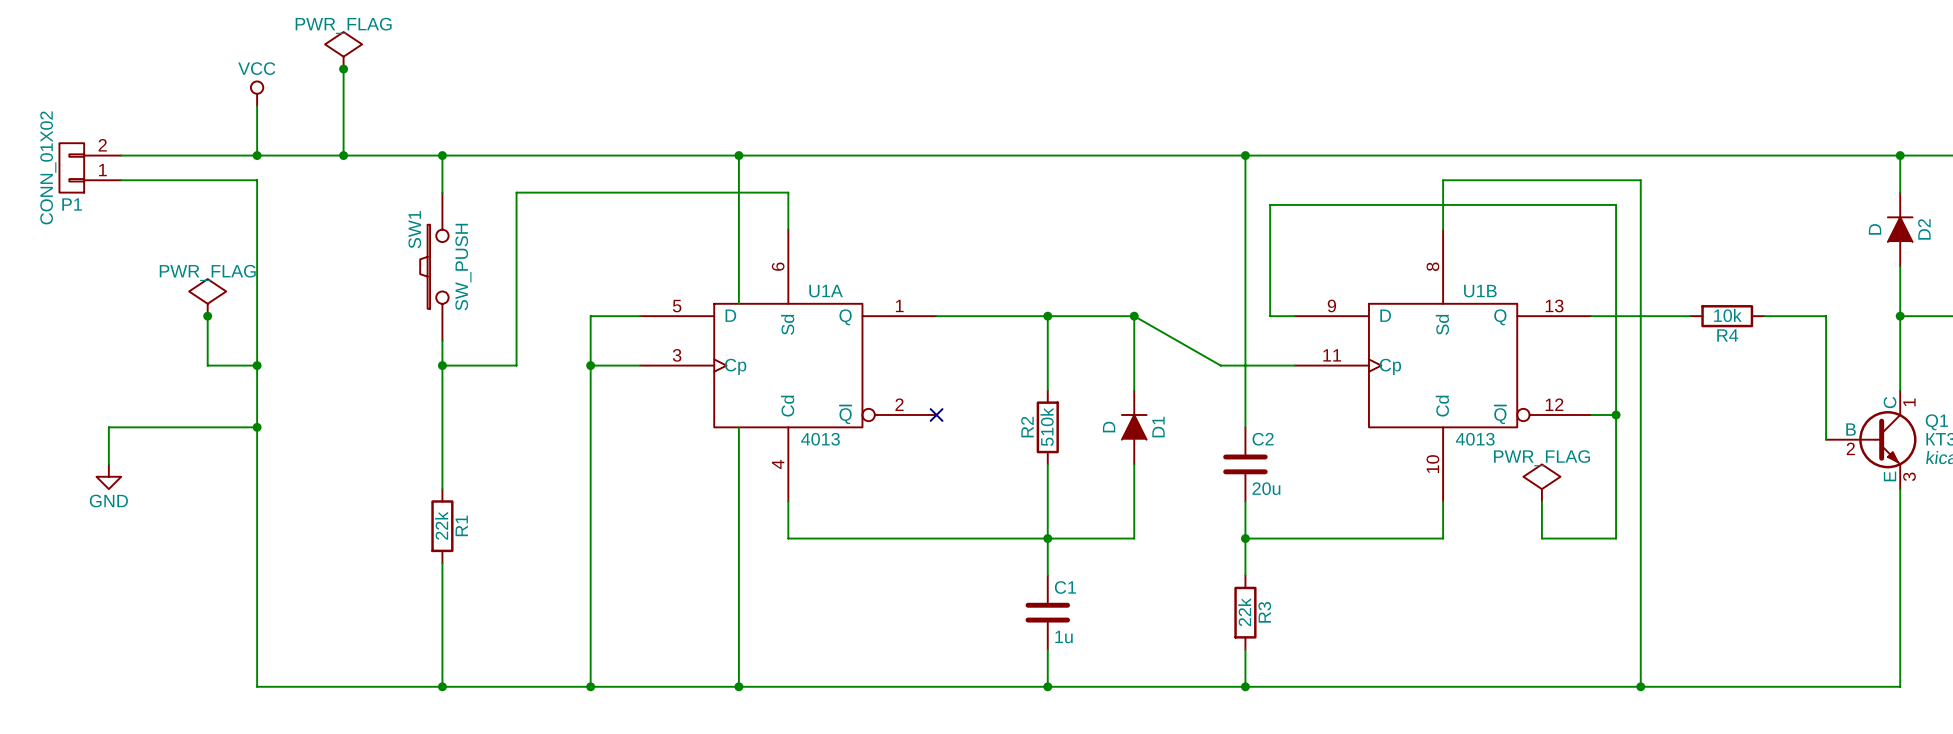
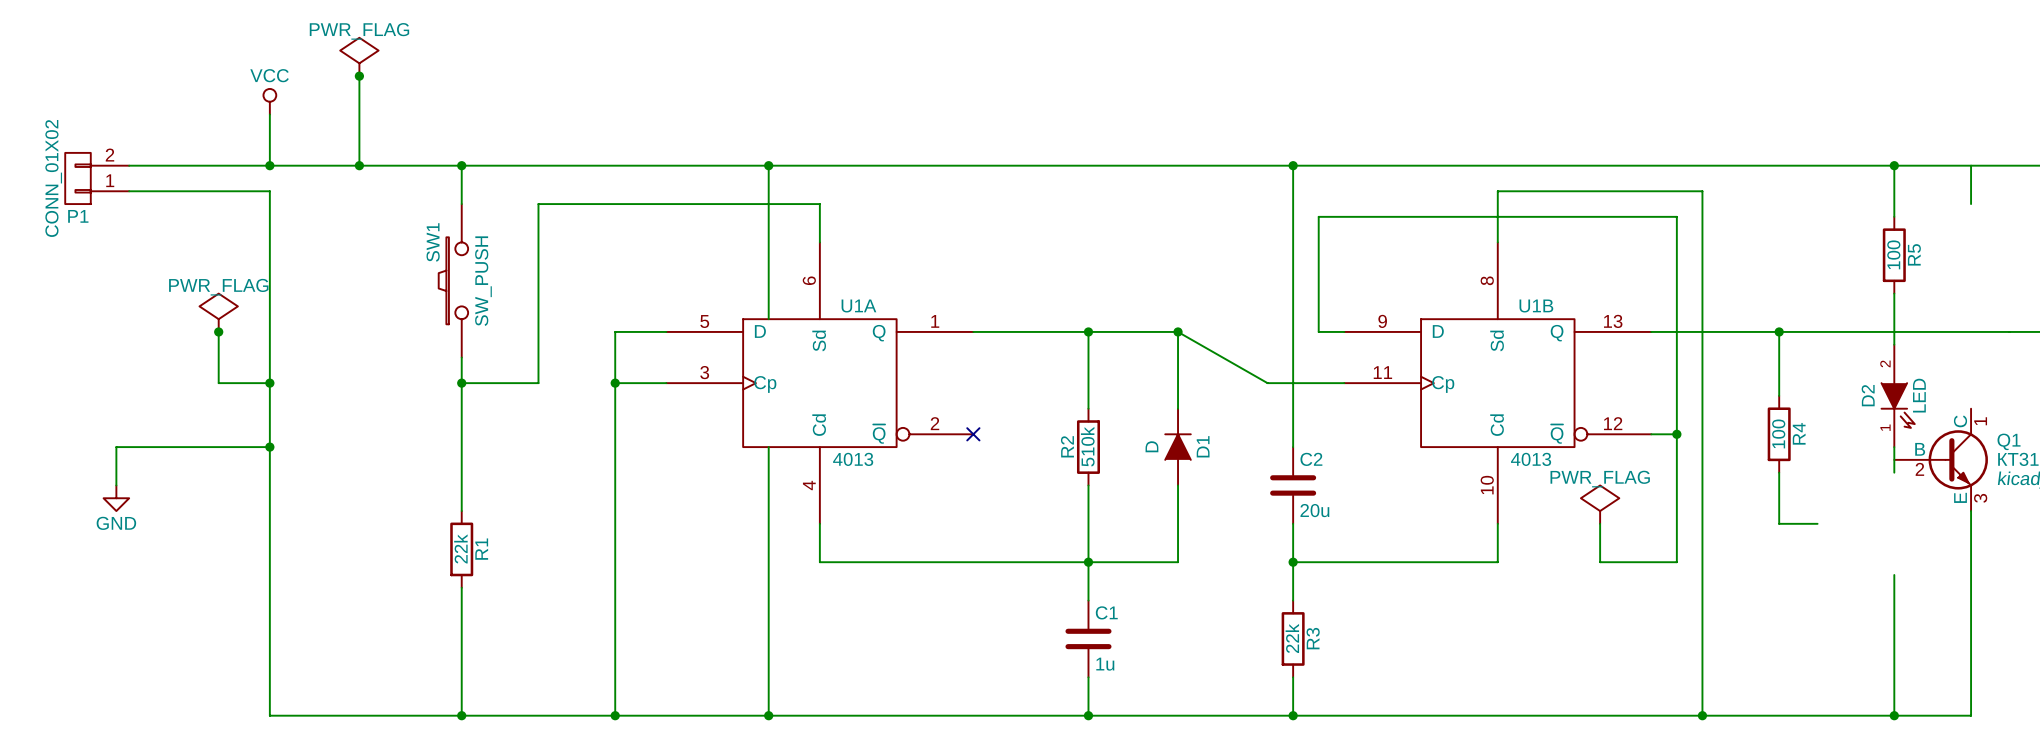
wire: none -> (1894, 165) (1894, 216)
junction: none -> (1894, 165)
junction: (1900, 155) -> none
D2 symbol: [1887, 192, 1914, 267] -> [1881, 344, 1915, 448]
D2 value: D (1875, 229) -> LED (1919, 395)
D2 name position: D2 (1924, 229) -> D2 (1868, 395)
R5: none -> 100 (1894, 255)
wire: (1900, 266) (1900, 390) -> none
wire: none -> (1894, 293) (1894, 331) (1971, 331)
R4 value: 10k (1727, 315) -> 100 (1778, 433)
wire: none -> (1753, 331) (1830, 331)
wire: none -> (1779, 331) (1779, 395)
junction: none -> (1779, 331)
R4 rotation: 0° (1727, 316) -> 90° clockwise (1779, 434)
R4 position: (1727, 316) -> (1779, 434)
junction: (1900, 316) -> none
R4 name position: R4 (1727, 335) -> R4 (1799, 433)
wire: none -> (1894, 459) (1894, 472)
wire: none -> (1779, 472) (1779, 523) (1817, 523)
wire: none -> (1894, 575) (1894, 715)
junction: none -> (1894, 715)

